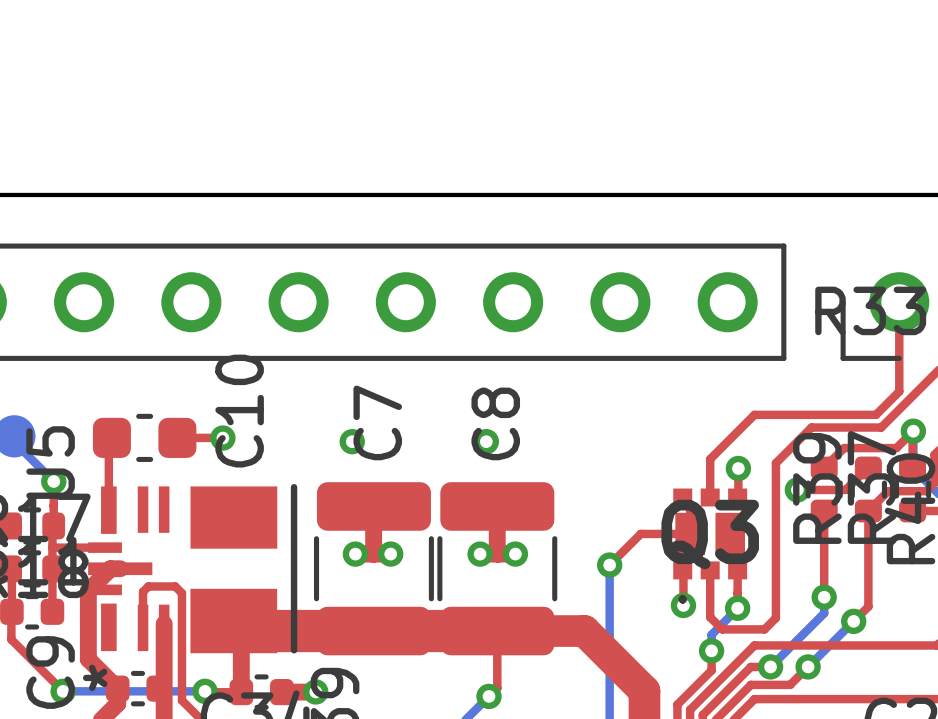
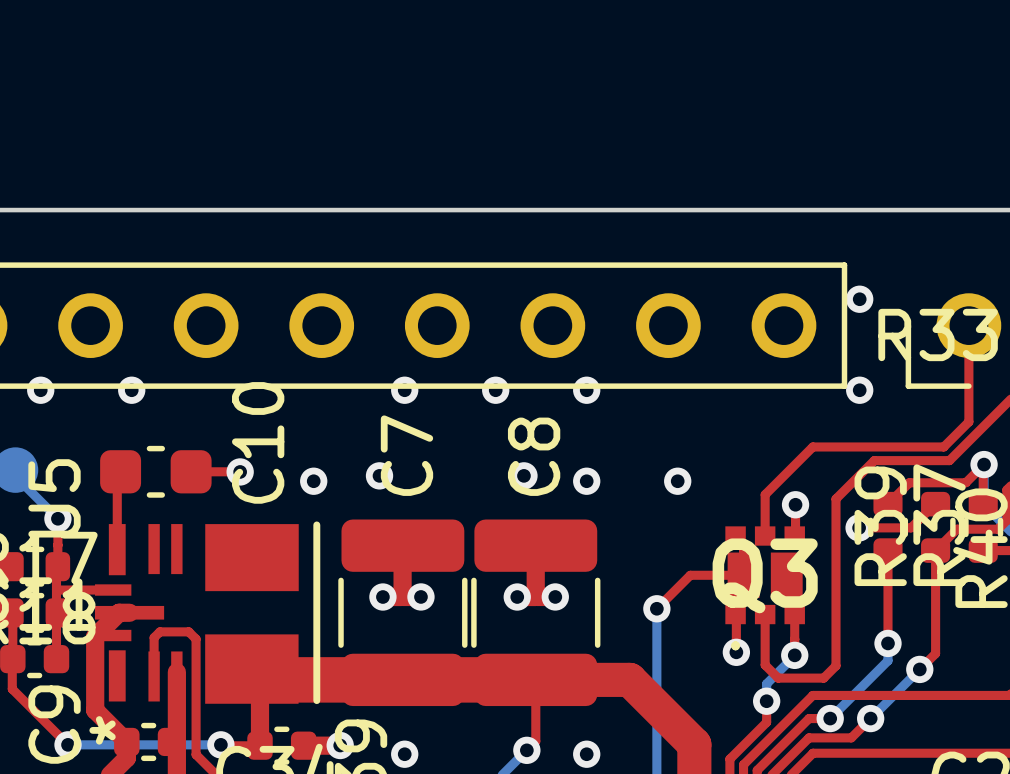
via: none -> (859, 299)
via: none -> (40, 390)
via: none -> (131, 390)
via: none -> (404, 390)
via: none -> (495, 390)
via: none -> (586, 390)
via: none -> (859, 390)
via: none -> (313, 481)
via: none -> (586, 481)
via: none -> (677, 481)
via: none -> (404, 754)
via: none -> (586, 754)

